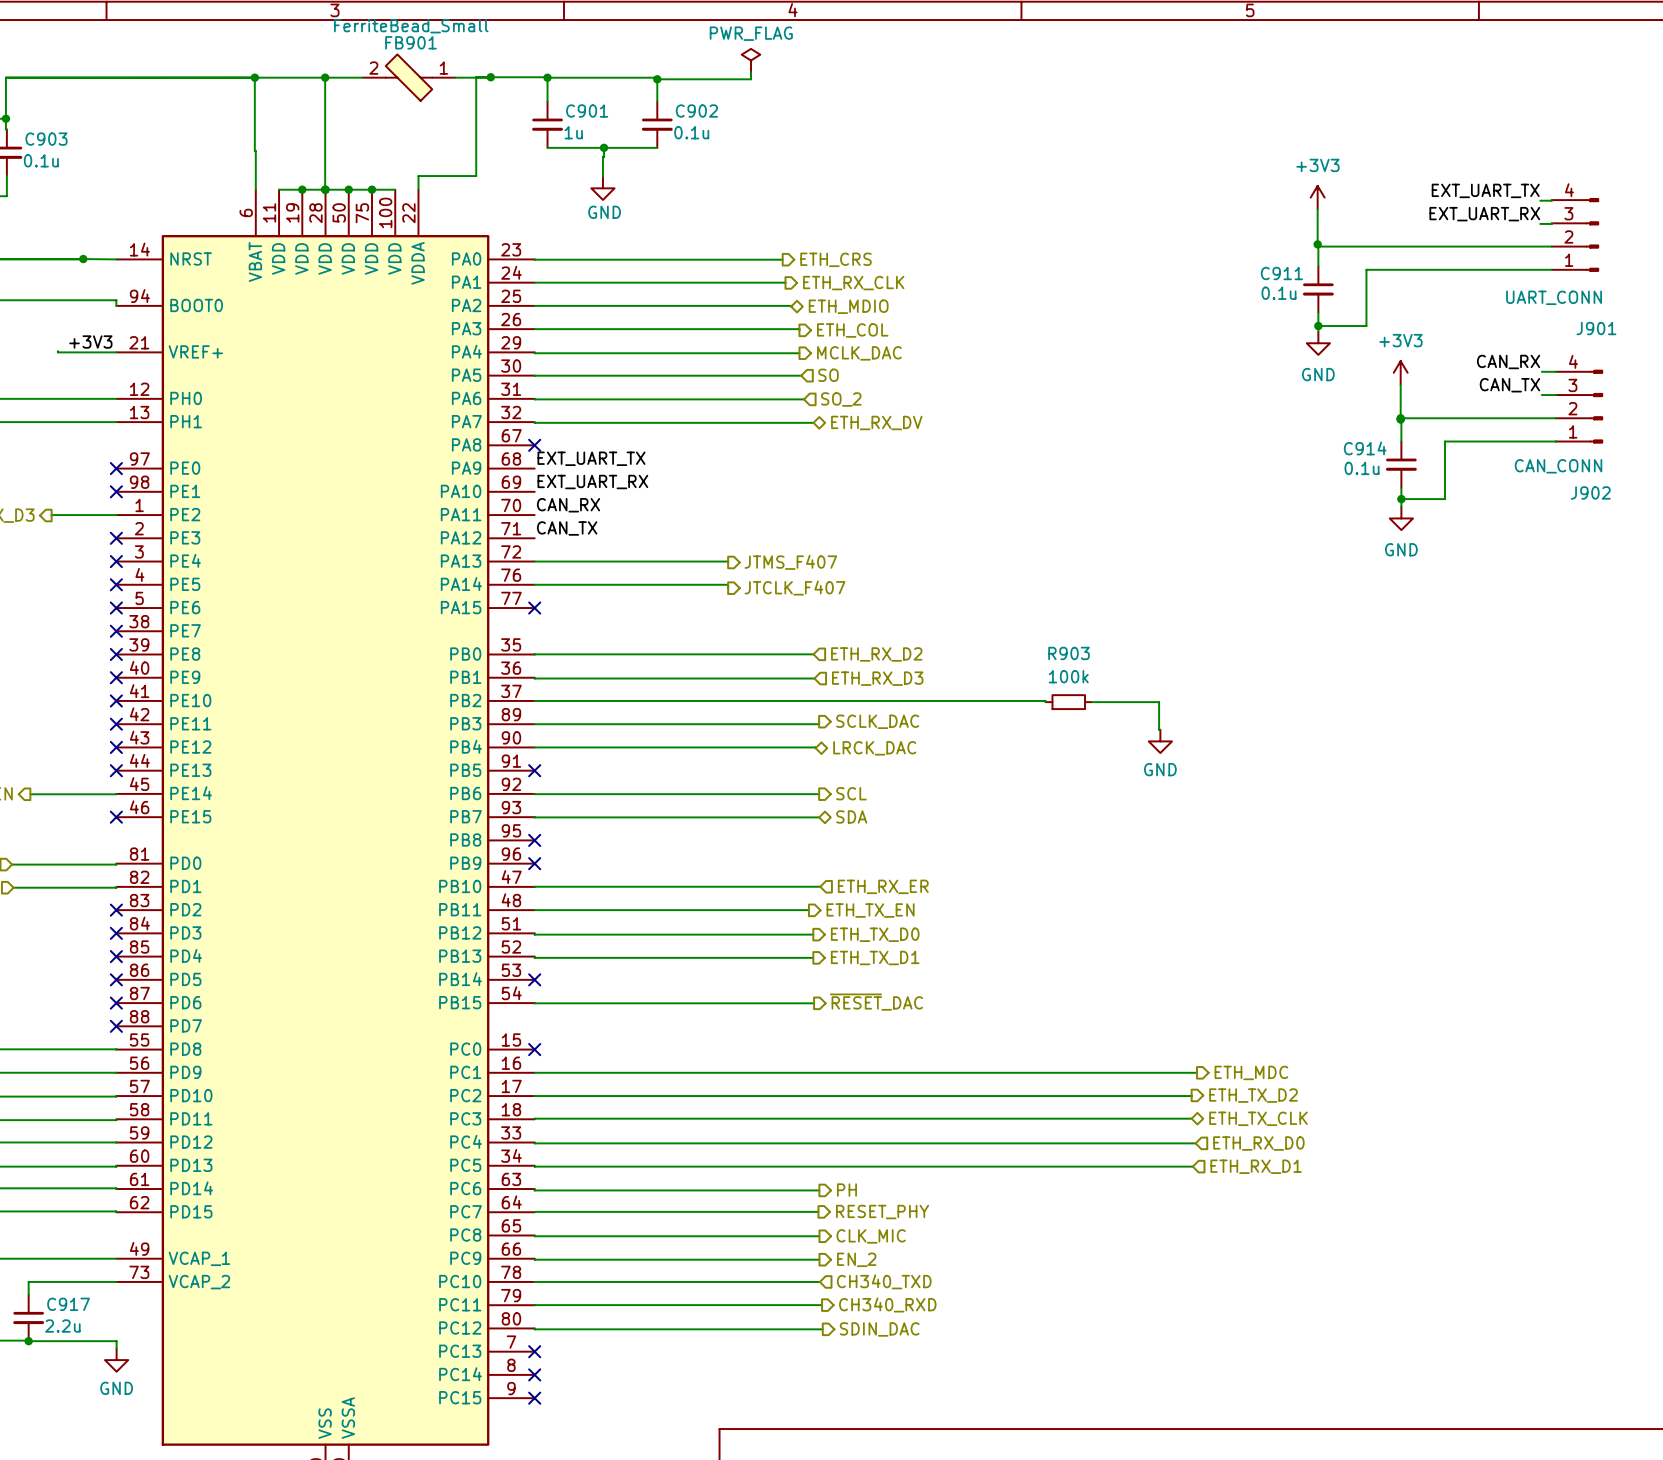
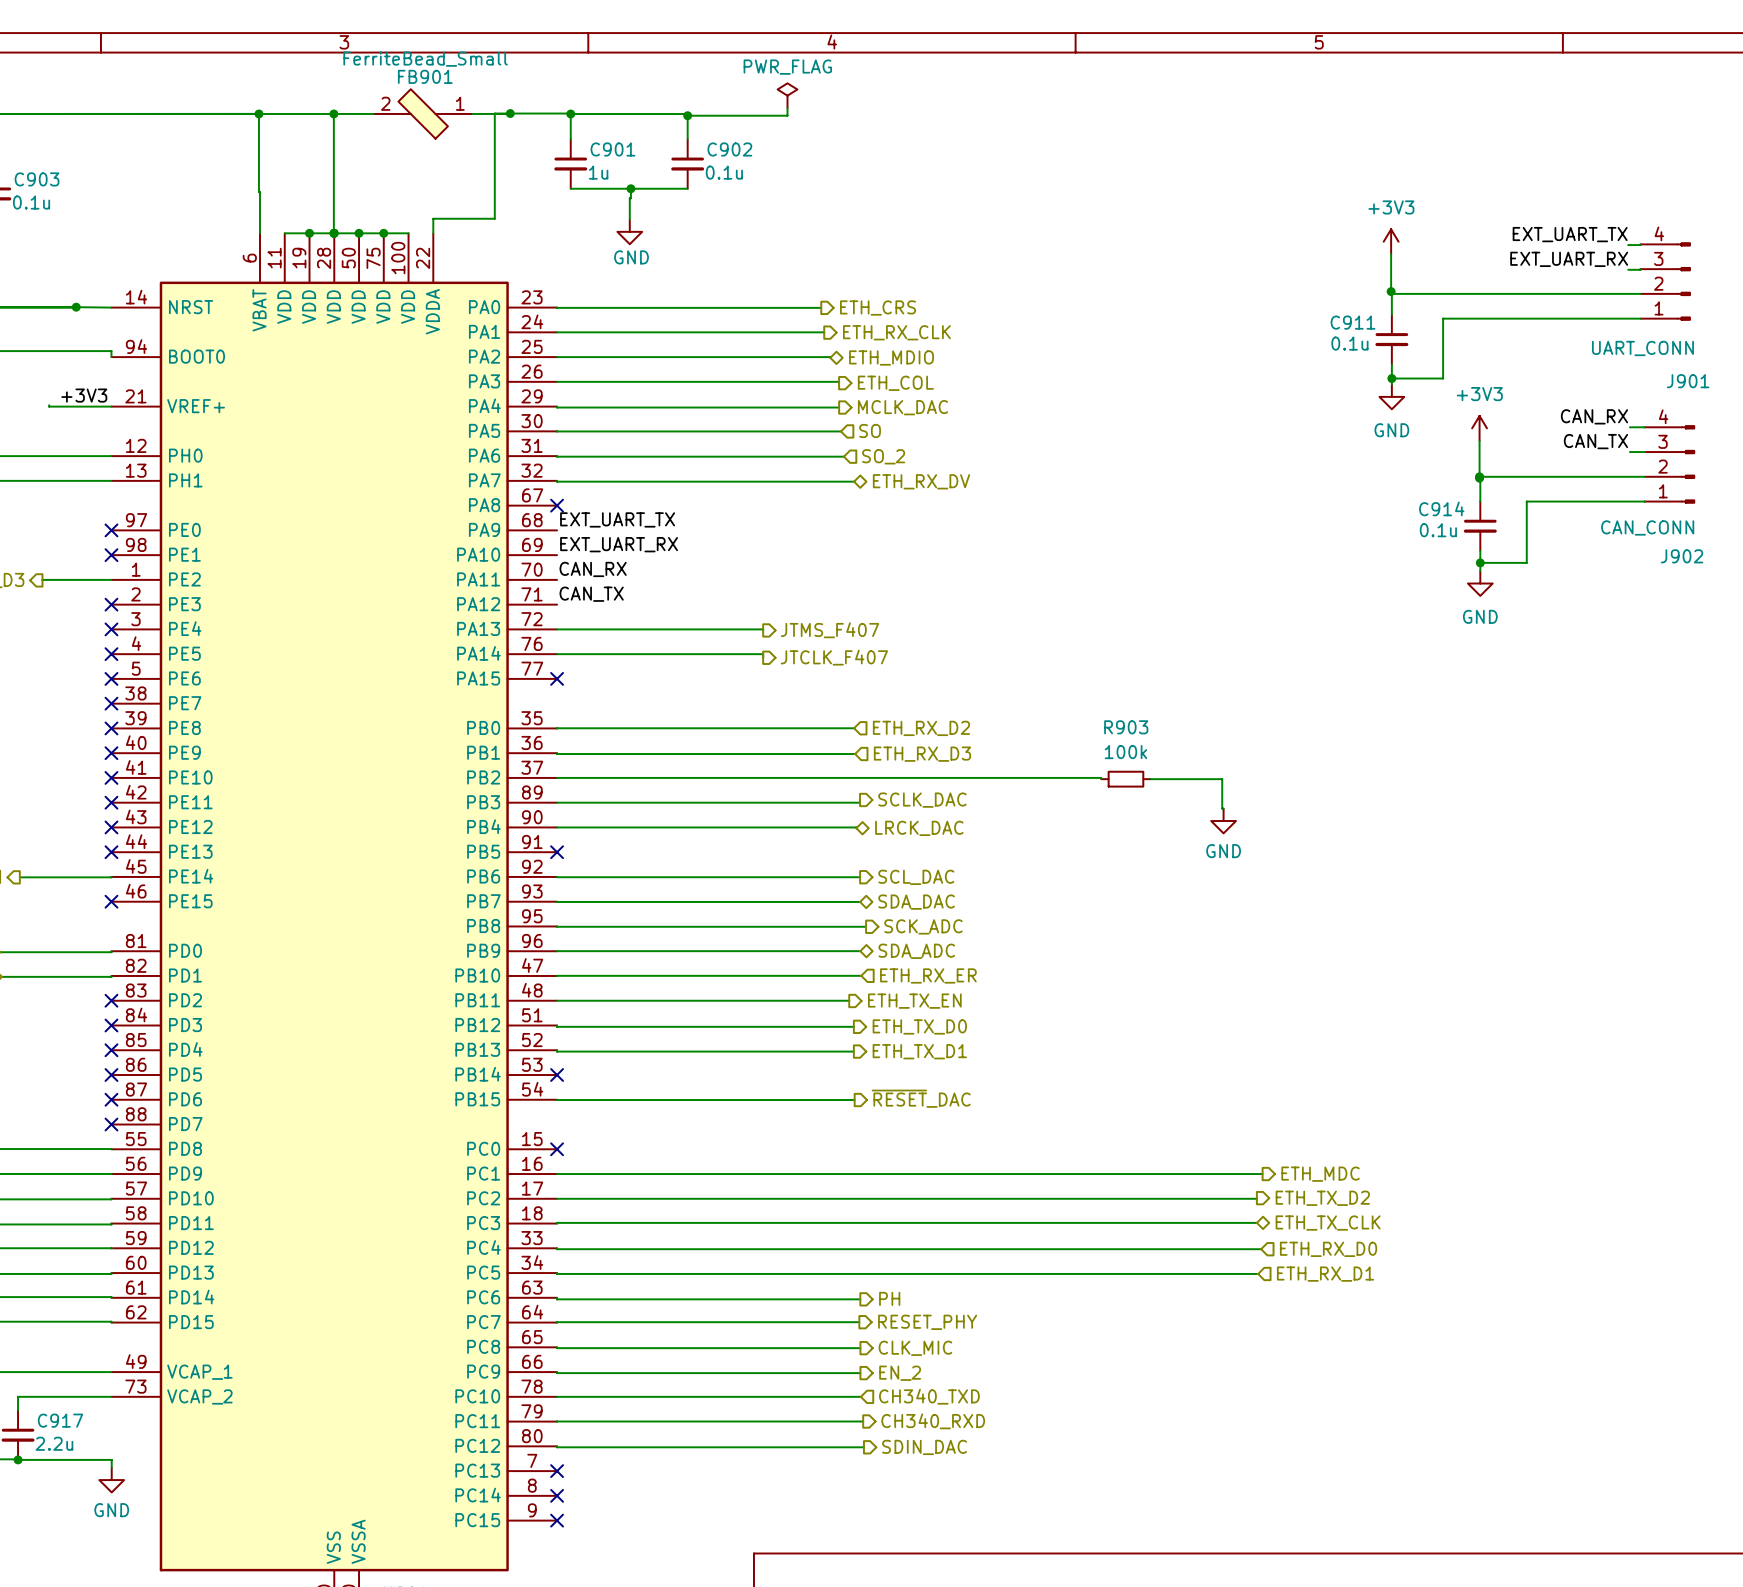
hierarchical label: SCL (851, 793) -> SCL_DAC (916, 877)
hierarchical label: SDA (851, 816) -> SDA_DAC (916, 902)
wire: none -> (557, 926) (866, 926)
no-connect mark: (534, 840) -> none
hierarchical label: none -> SCK_ADC (923, 926)
wire: none -> (557, 951) (860, 951)
no-connect mark: (534, 863) -> none
hierarchical label: none -> SDA_ADC (916, 951)

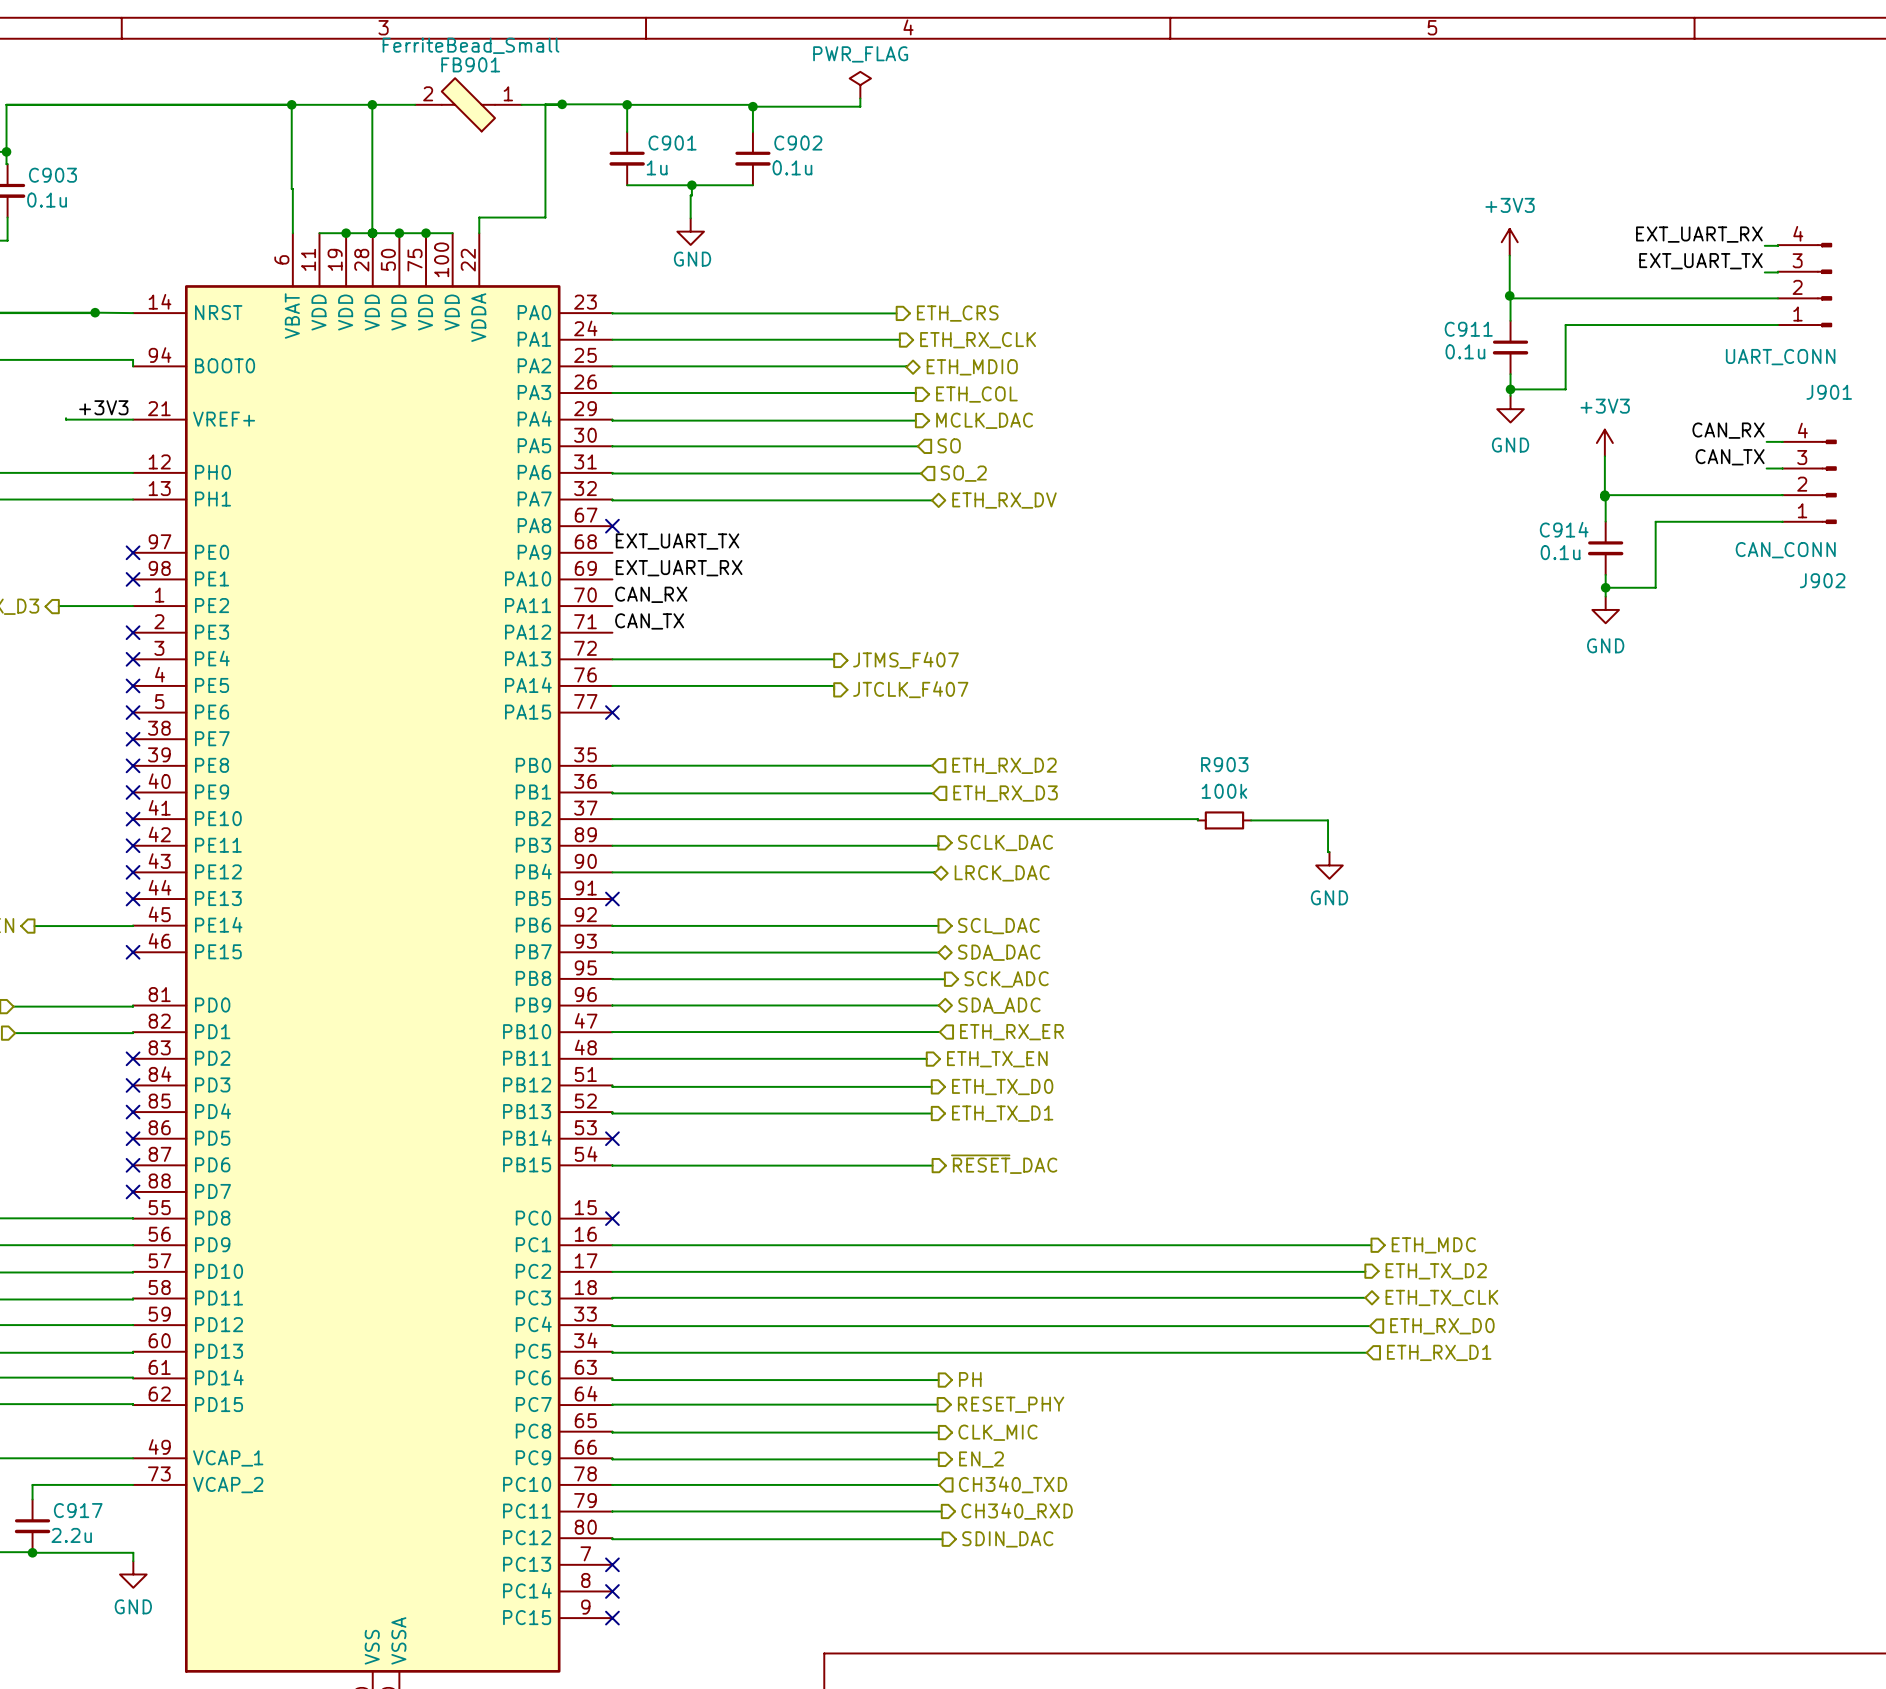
label: EXT_UART_TX (1570, 234) -> EXT_UART_RX (1699, 234)
label: EXT_UART_RX (1569, 259) -> EXT_UART_TX (1700, 261)

